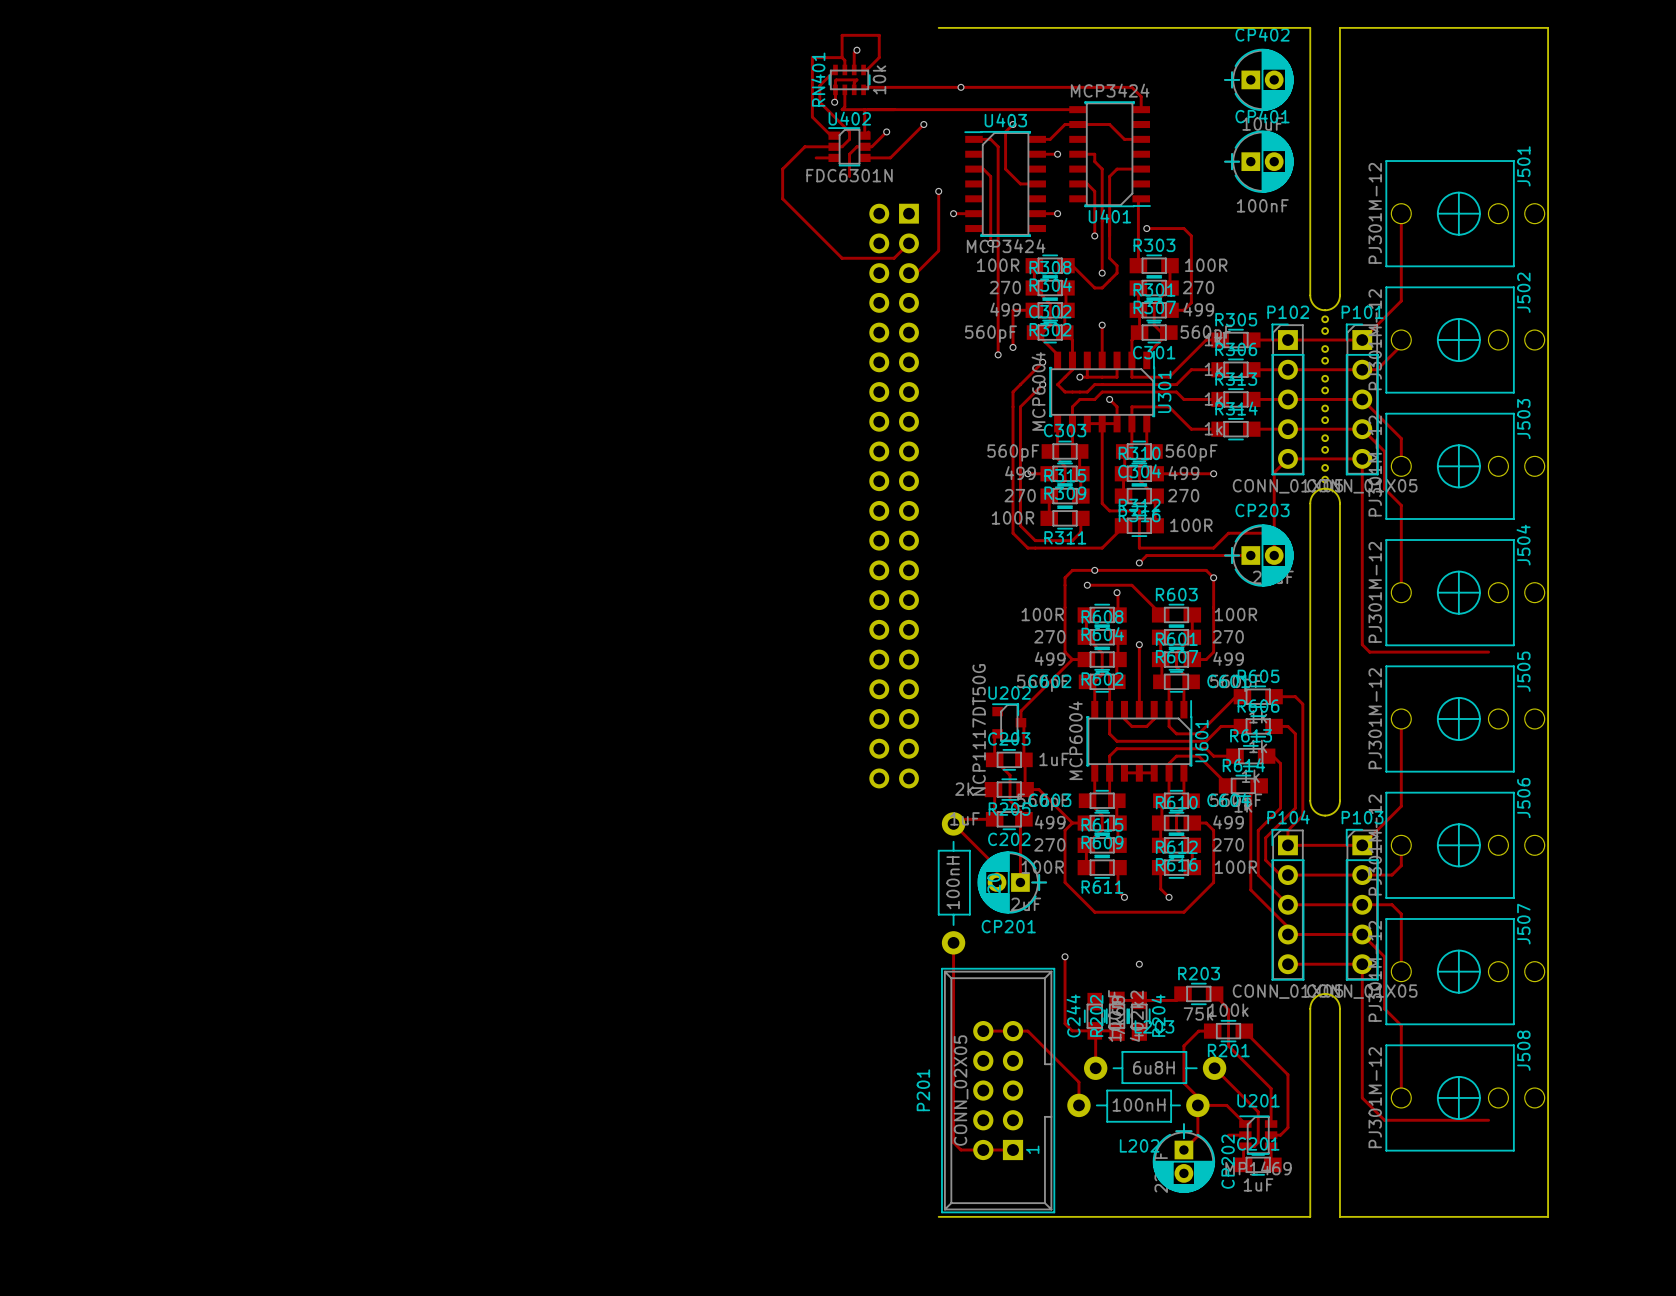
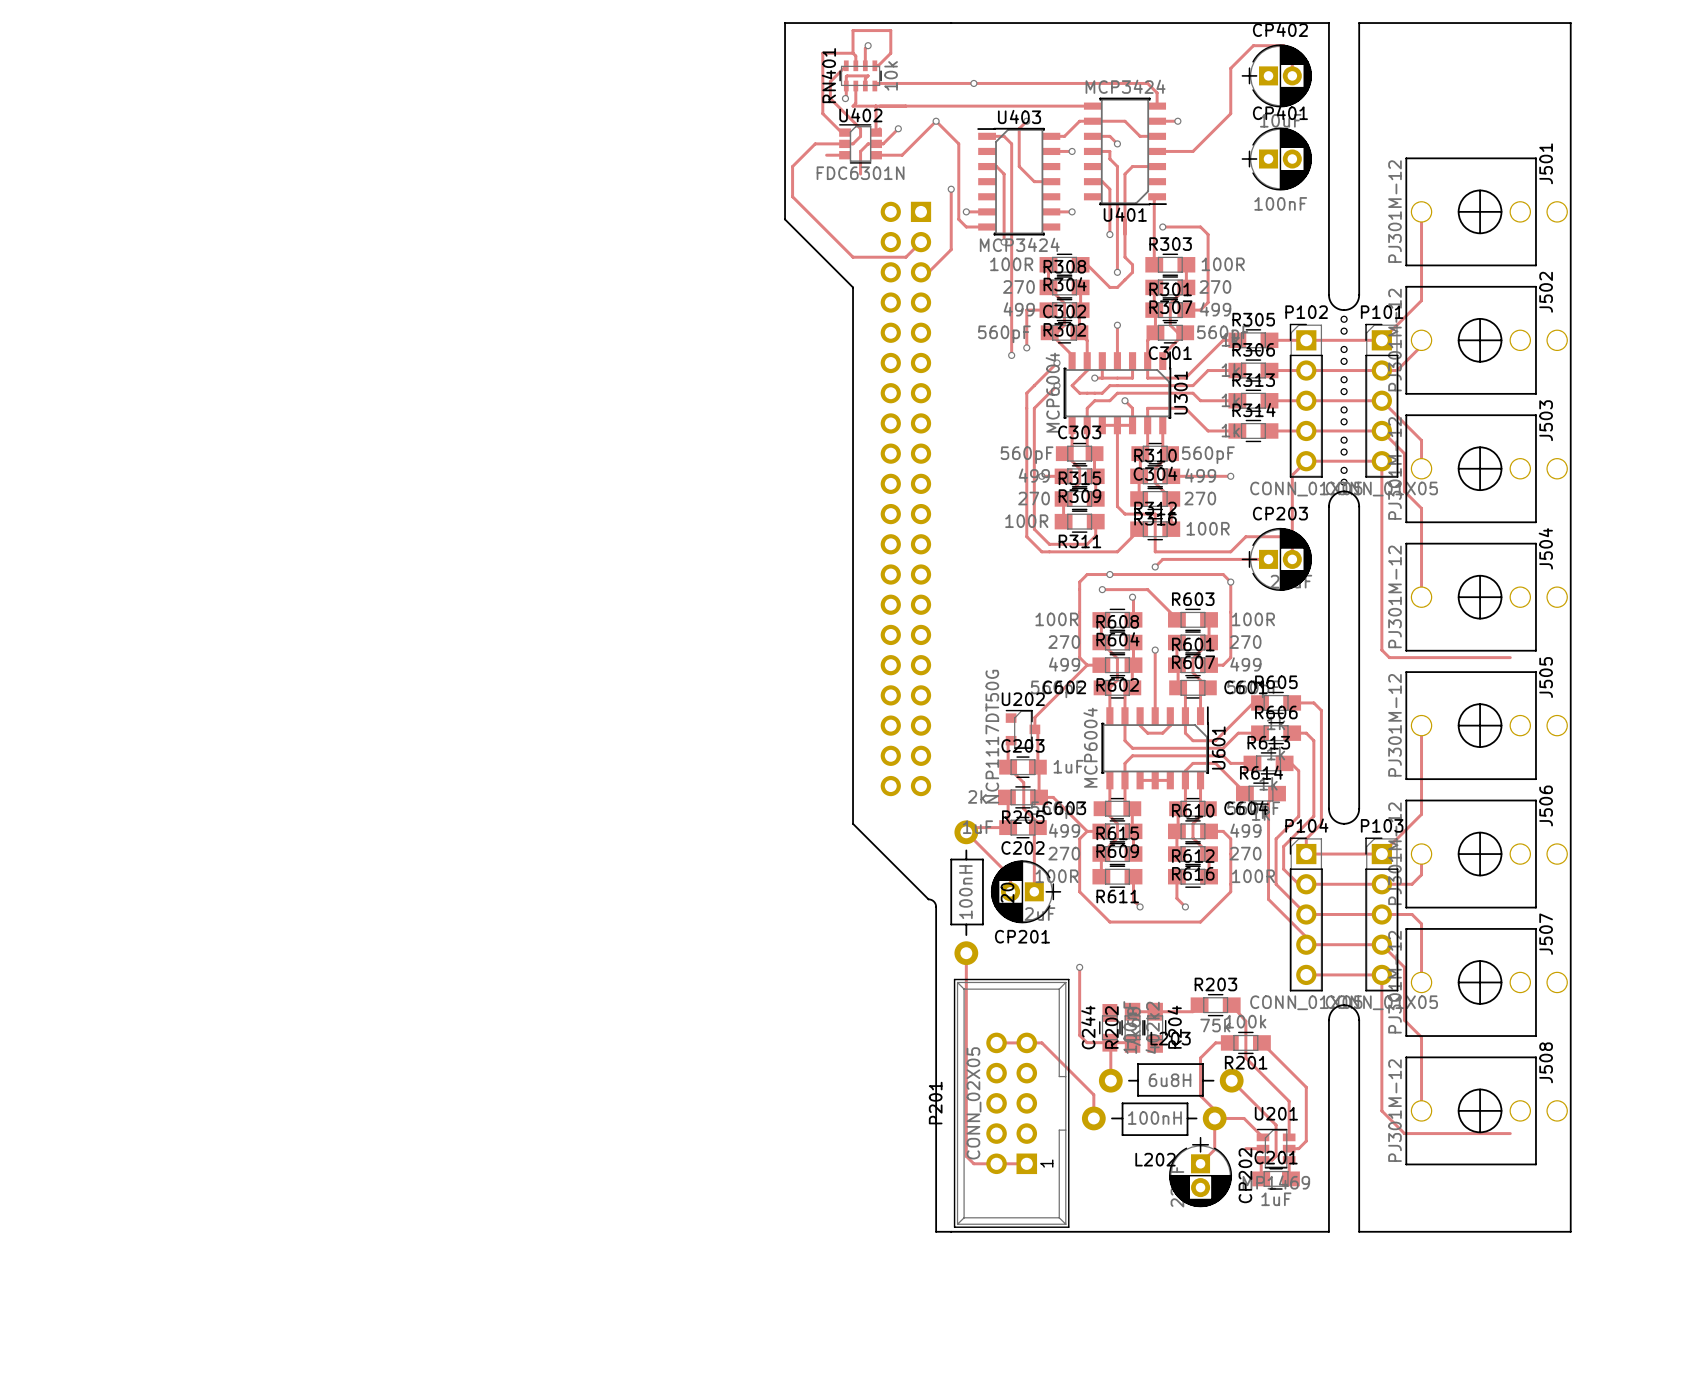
board edge: none -> (951, 23) (785, 23) (785, 219) (853, 287) (853, 823) (935, 904) (936, 1231) (951, 1231)
track: none -> (1292, 75) (1292, 54) (1283, 45) (1253, 45) (1230, 68) (1230, 113) (1192, 151) (1157, 151)
track: none -> (936, 121) (958, 143) (958, 219) (966, 226) (987, 226)
track: none -> (1157, 121) (1177, 121)
via: none -> (1177, 121)
track: none -> (1092, 136) (1109, 136) (1117, 143)
via: none -> (1117, 143)
via: (1139, 964) -> none

